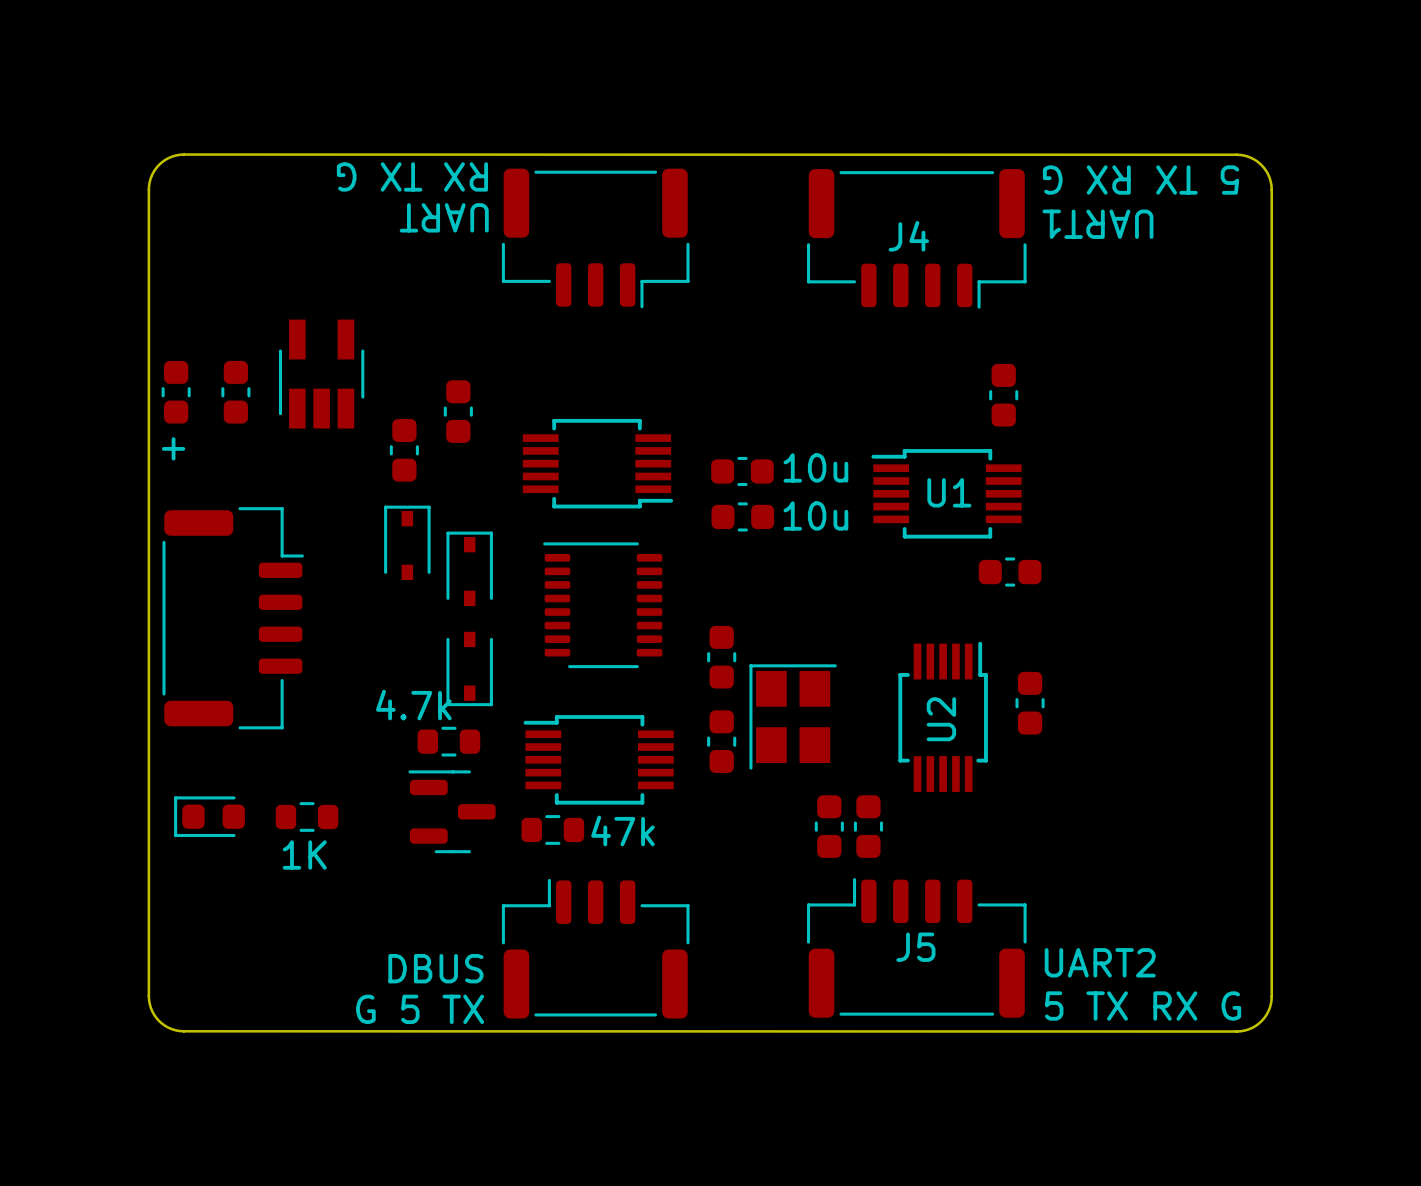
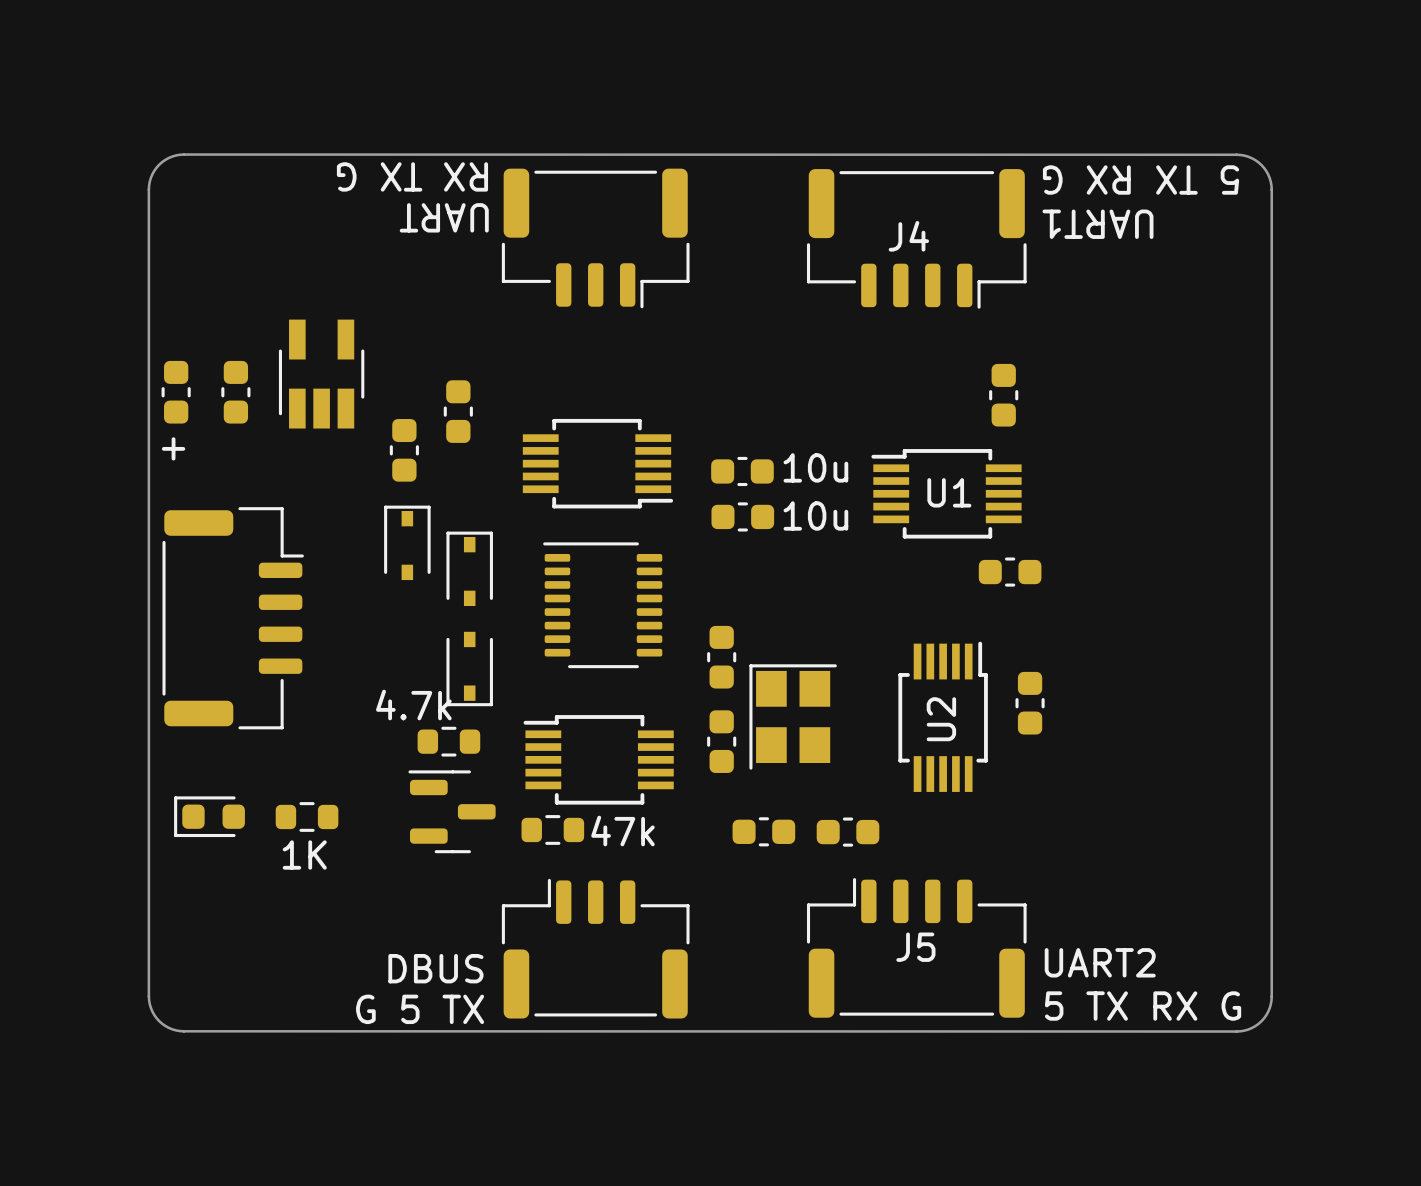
part: (829, 826) -> none
part: (868, 826) -> none
part: none -> (763, 831)
part: none -> (848, 832)

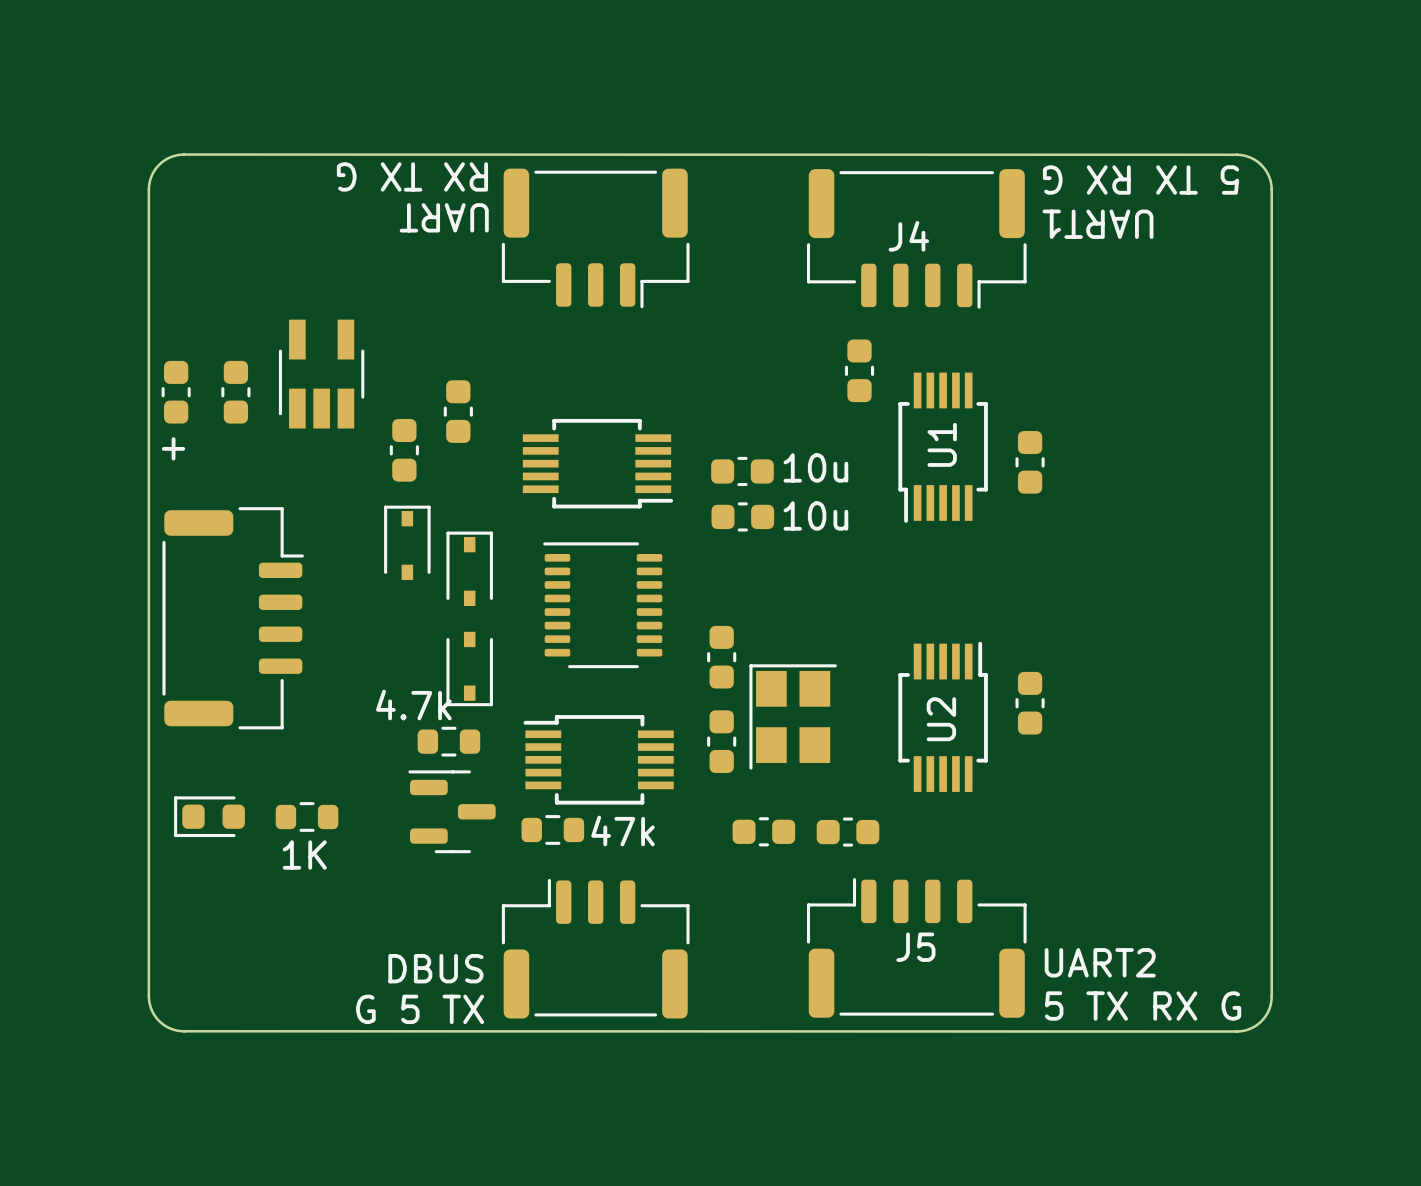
part: none -> (859, 370)
part: (1003, 395) -> none
part: none -> (1030, 462)
U1 rotation: 0° (946, 493) -> 90° counterclockwise (943, 447)
part: (1010, 572) -> none

